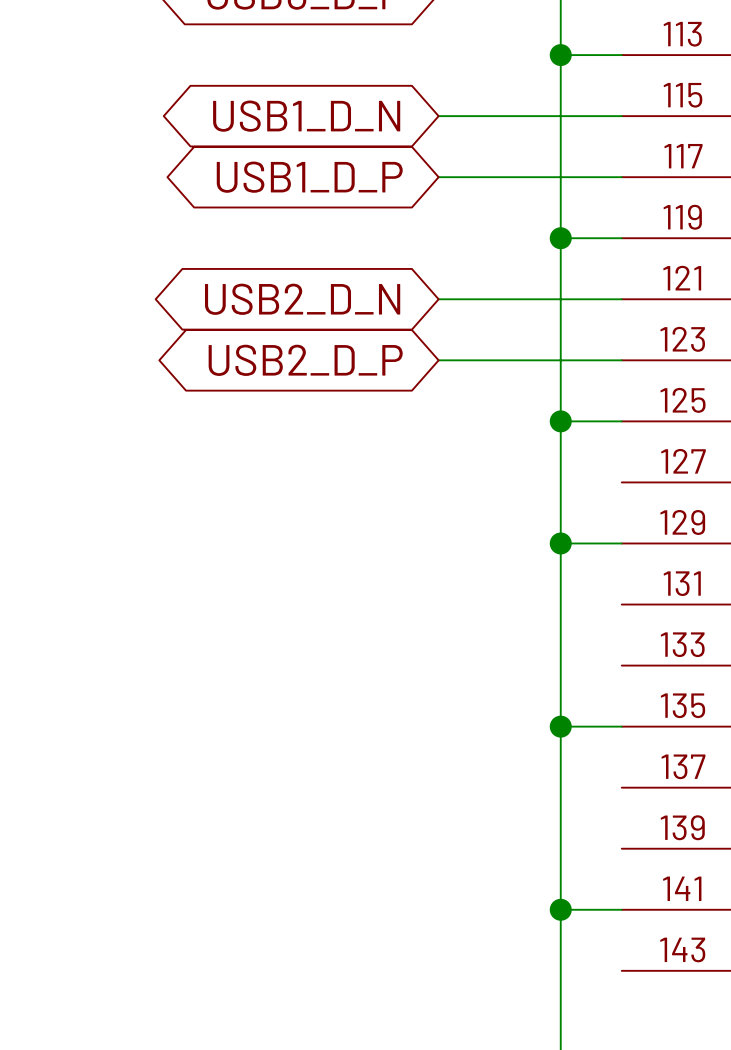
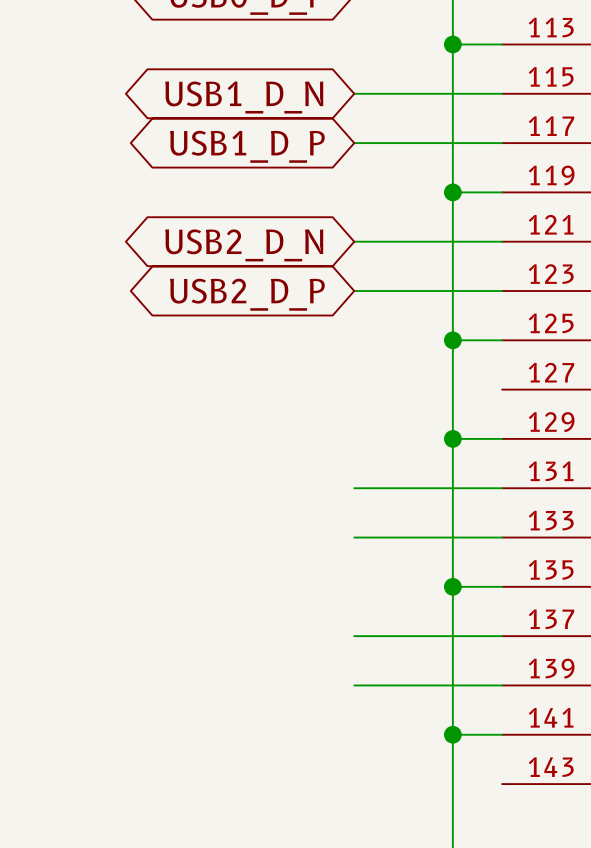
wire: none -> (354, 488) (502, 488)
wire: none -> (354, 537) (502, 537)
wire: none -> (354, 636) (502, 636)
wire: none -> (354, 685) (502, 685)

